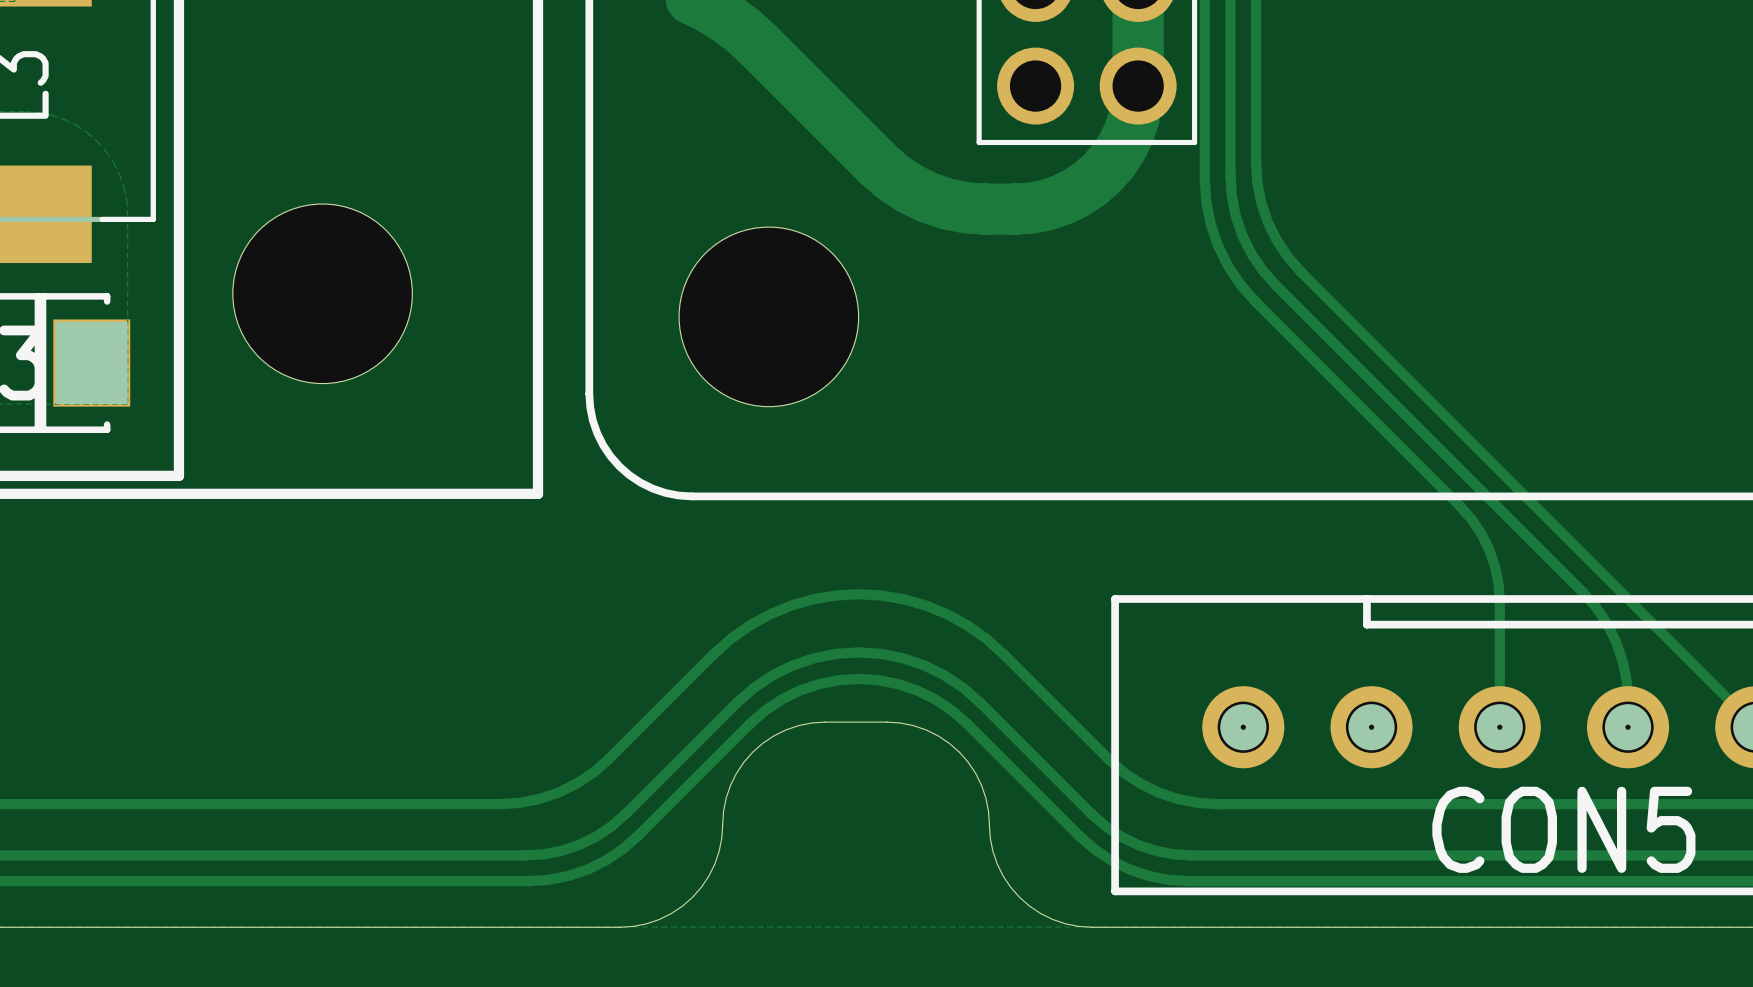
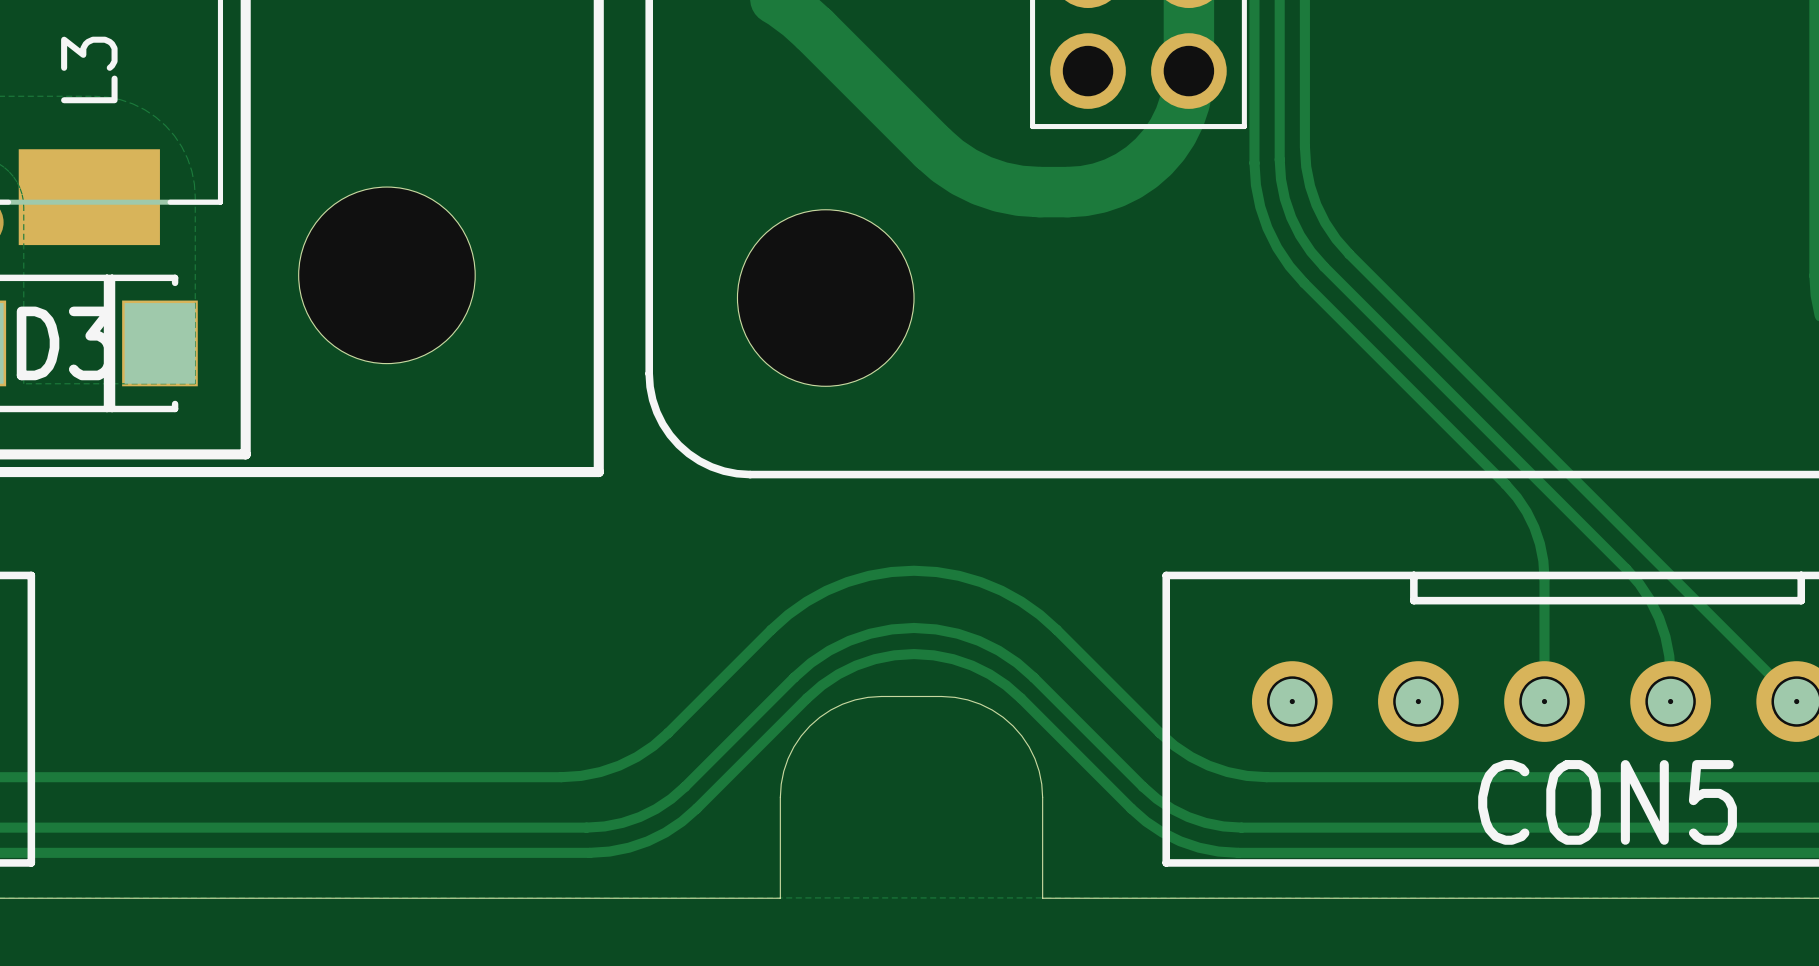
board edge: (722, 824) (719, 851) (714, 863) (708, 875) (692, 897) (671, 913) (659, 919) (646, 923) (620, 927) -> (780, 797) (780, 898) (679, 898)
board edge: (989, 824) (992, 851) (997, 863) (1003, 875) (1019, 897) (1040, 913) (1052, 919) (1065, 923) (1092, 927) -> (1042, 797) (1042, 898) (1143, 898)

